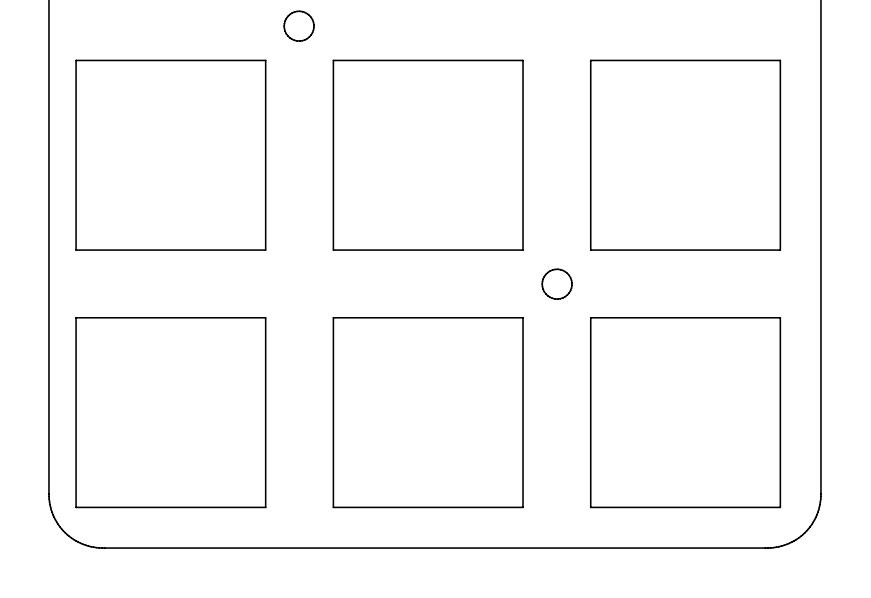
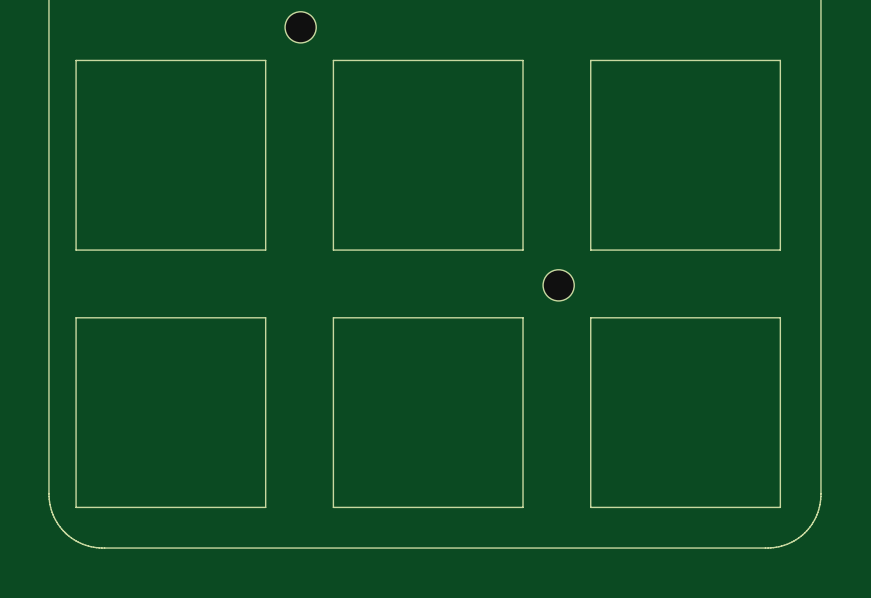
board edge: (299, 11) (309, 15) (313, 27) (307, 38) (297, 40) (286, 33) (284, 23) (289, 14) (299, 11) -> none
hole: none -> (300, 27)
board edge: (557, 269) (567, 273) (571, 285) (565, 296) (555, 298) (545, 293) (542, 284) (547, 272) (557, 269) -> none
hole: none -> (558, 285)

